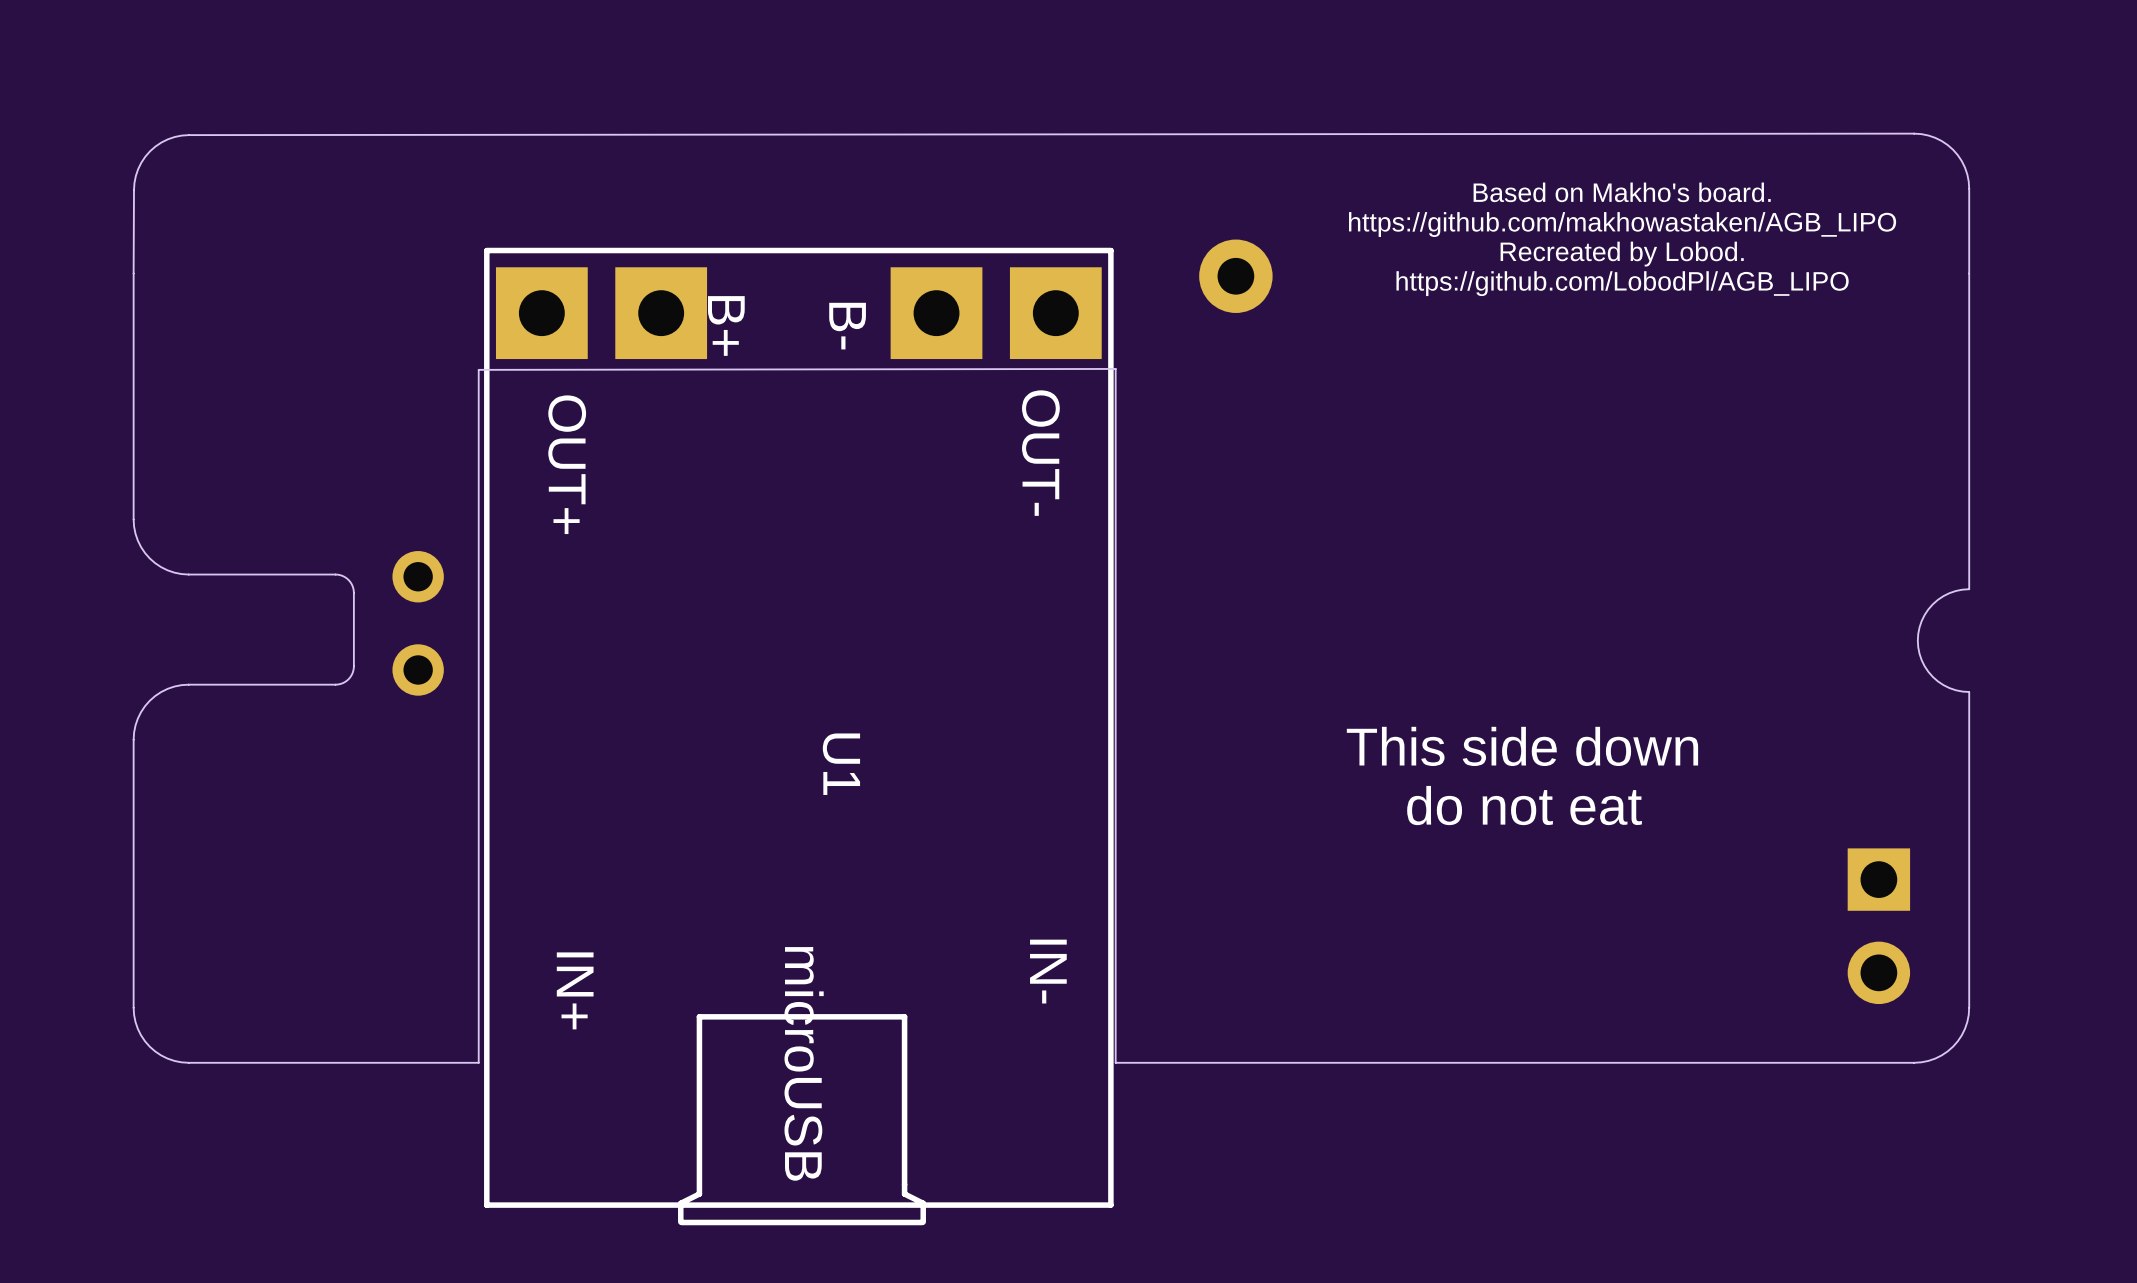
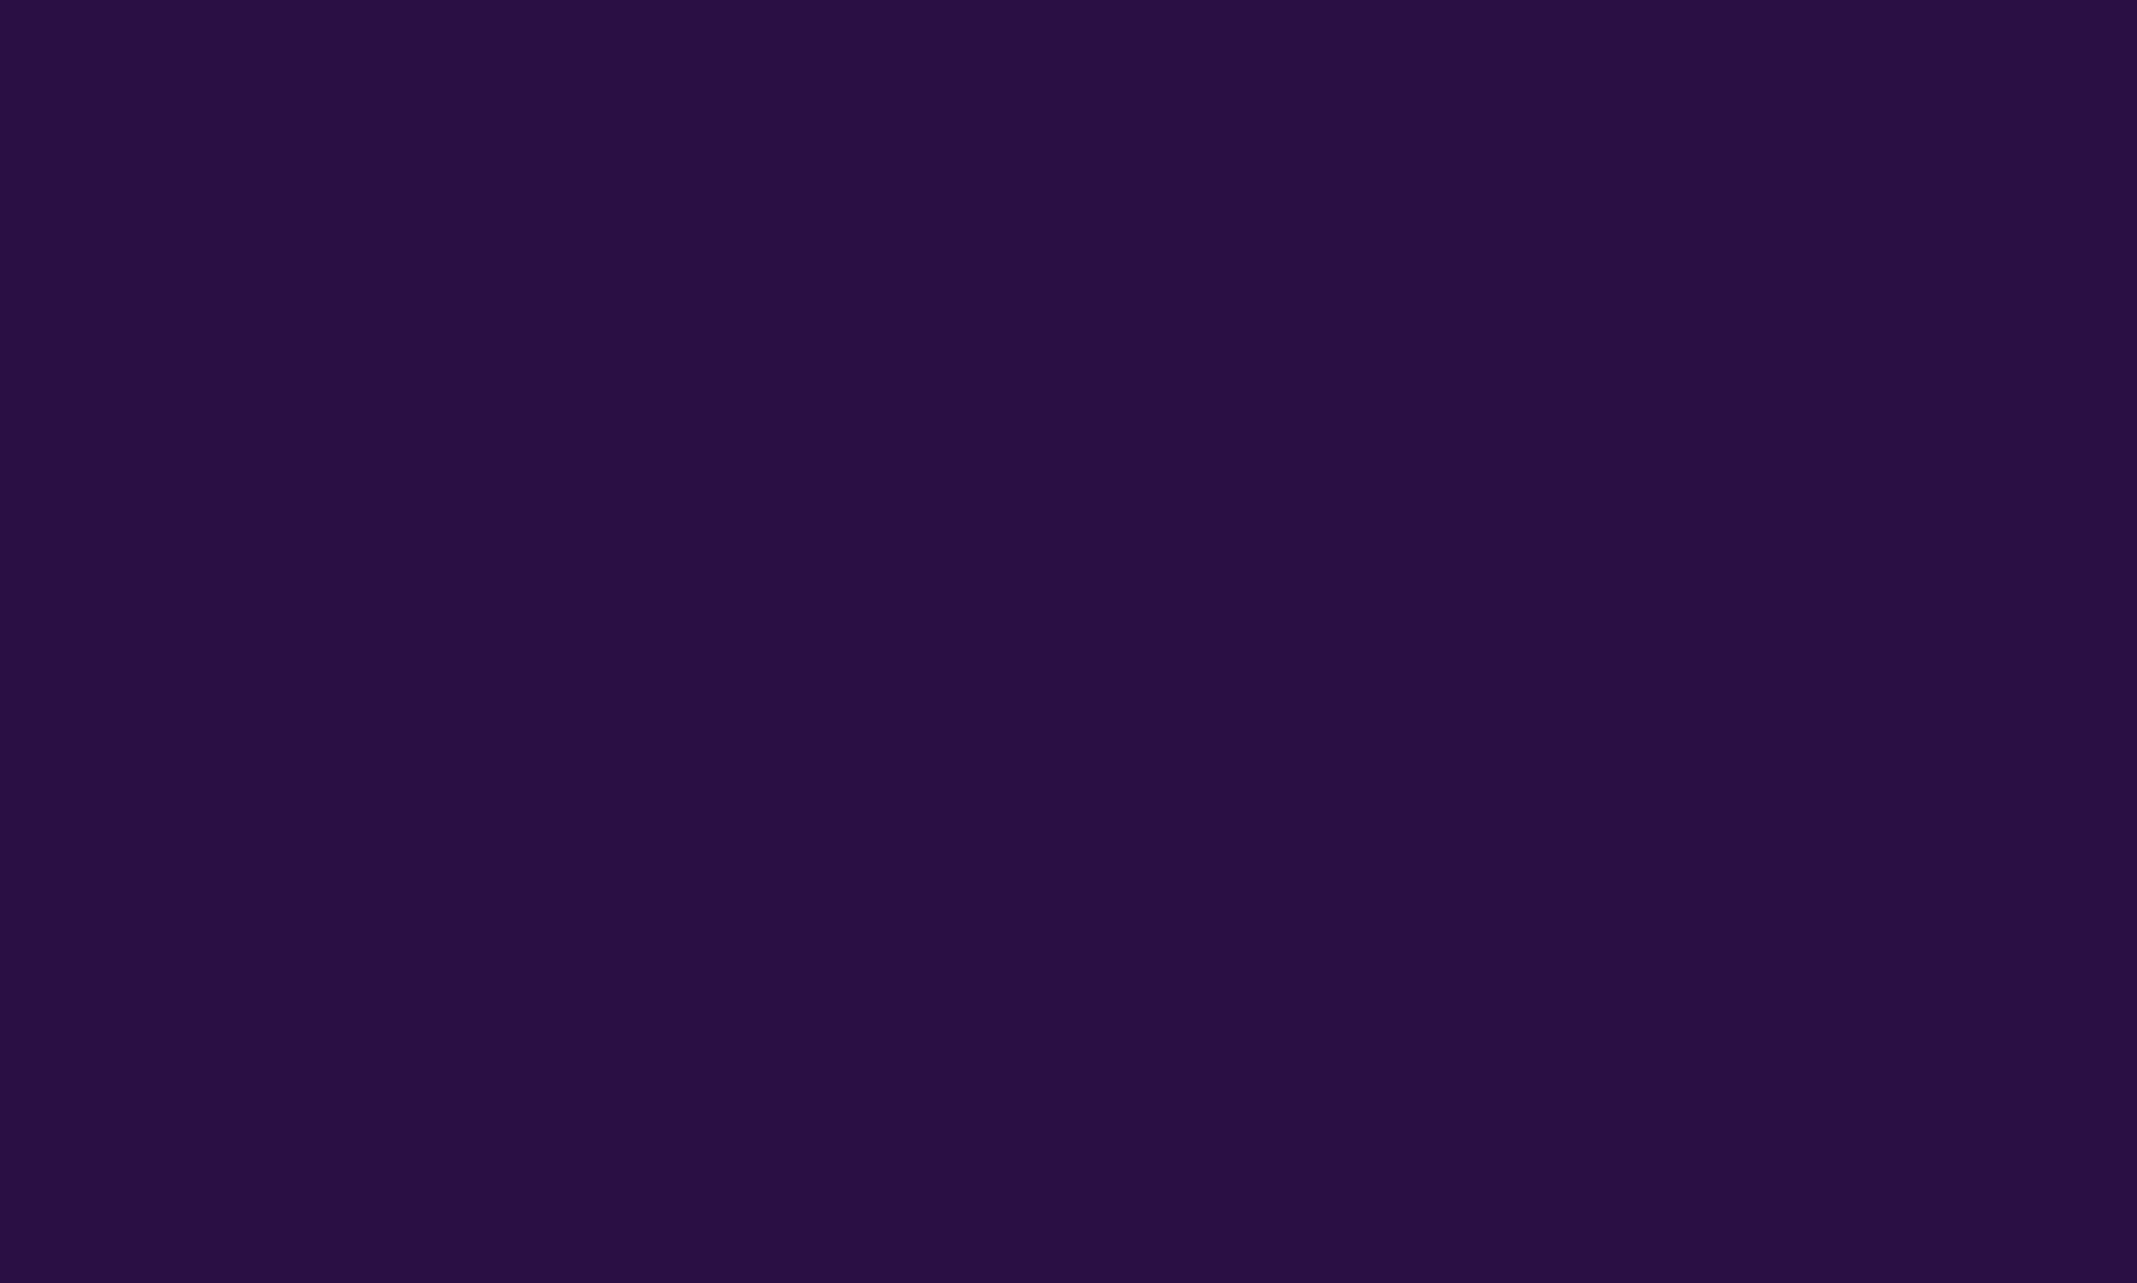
text: Based on Makho's board. (1622, 192) -> none
text: https://github.com/makhowastaken/AGB_LIPO (1622, 224) -> none
text: Recreated by Lobod. (1622, 254) -> none
part: (1235, 276) -> none
text: https://github.com/LobodPl/AGB_LIPO (1622, 283) -> none
board edge: (1969, 589) (1968, 181) (1965, 167) (1957, 155) (1947, 145) (1928, 135) (1914, 133) (189, 135) (174, 136) (155, 146) (145, 156) (138, 169) (134, 182) (133, 519) (135, 533) (141, 547) (149, 558) (161, 567) (174, 572) (188, 574) (335, 574) (344, 576) (350, 581) (353, 590) (353, 666) (348, 679) (337, 684) (188, 684) (174, 686) (155, 696) (141, 712) (135, 725) (133, 739) (133, 1007) (135, 1021) (145, 1041) (155, 1051) (167, 1058) (181, 1062) (478, 1062) (478, 369) (1115, 368) (1115, 1062) (1914, 1062) (1928, 1060) (1941, 1055) (1957, 1041) (1965, 1028) (1968, 1014) (1969, 692) (1949, 688) (1932, 676) (1921, 660) (1917, 640) (1921, 620) (1932, 604) (1949, 593) (1969, 589) -> none
part: (418, 623) -> none
U1: (798, 736) -> none
text: This side down (1522, 746) -> none
text: do not eat (1524, 805) -> none
part: (1878, 926) -> none

